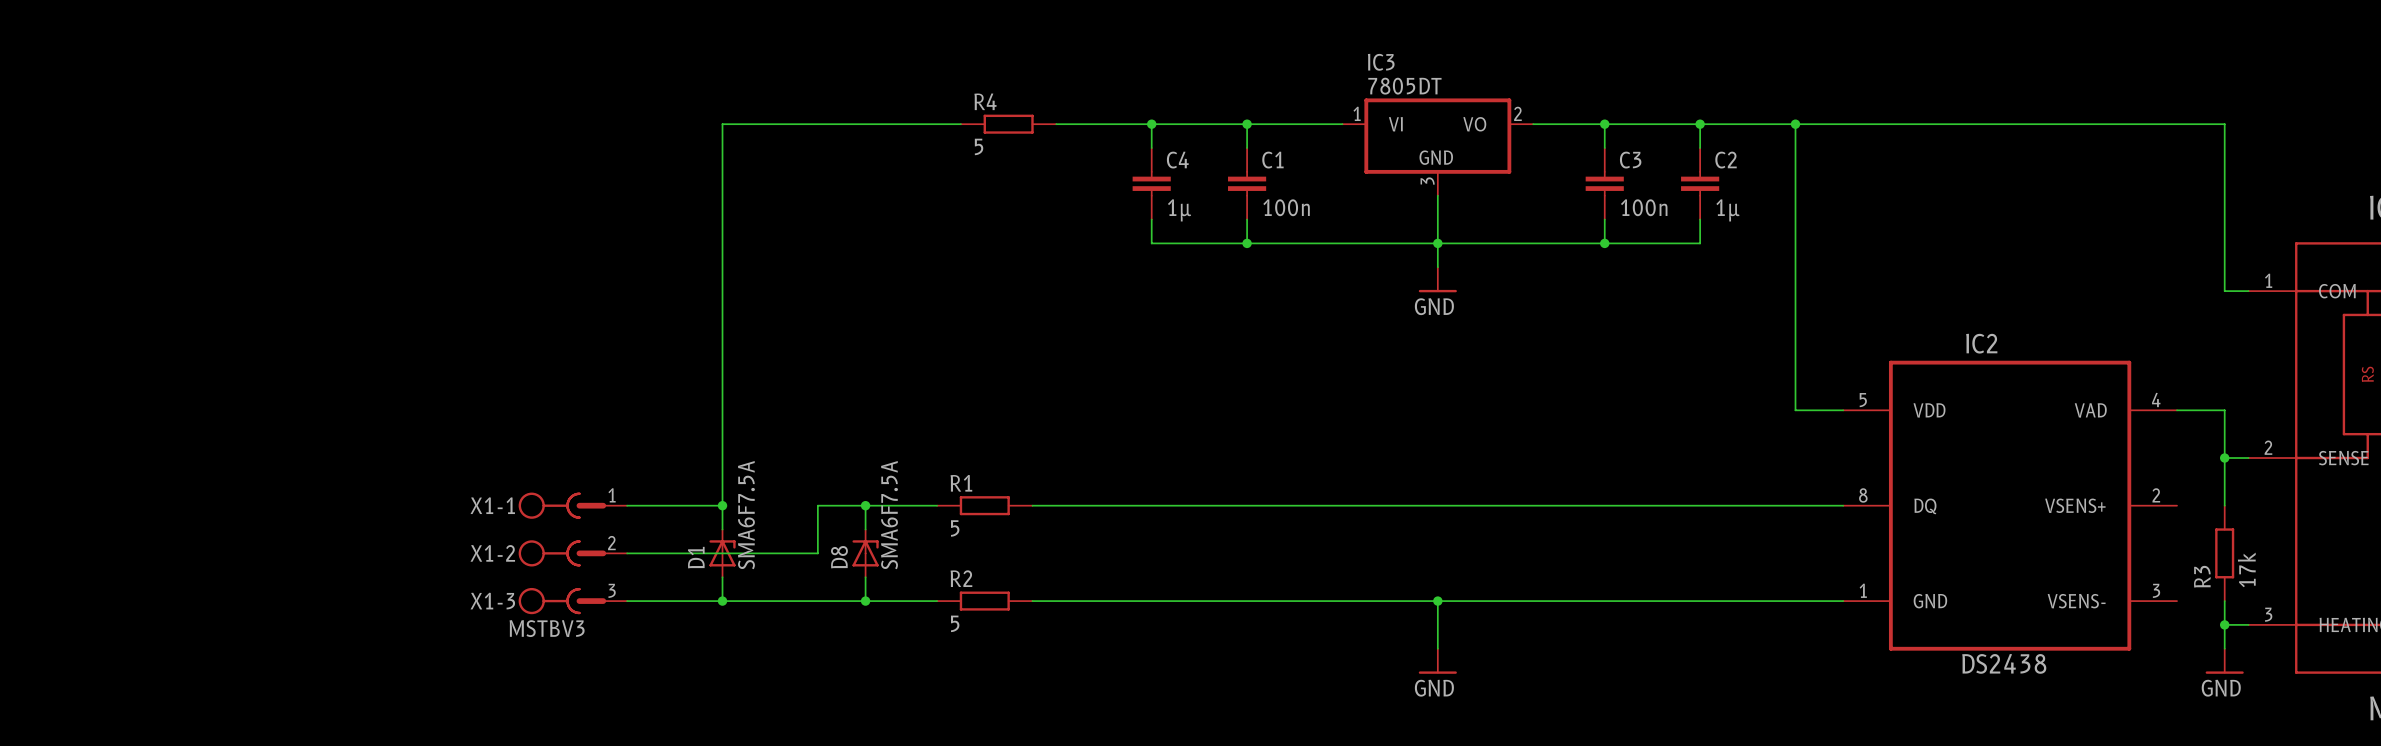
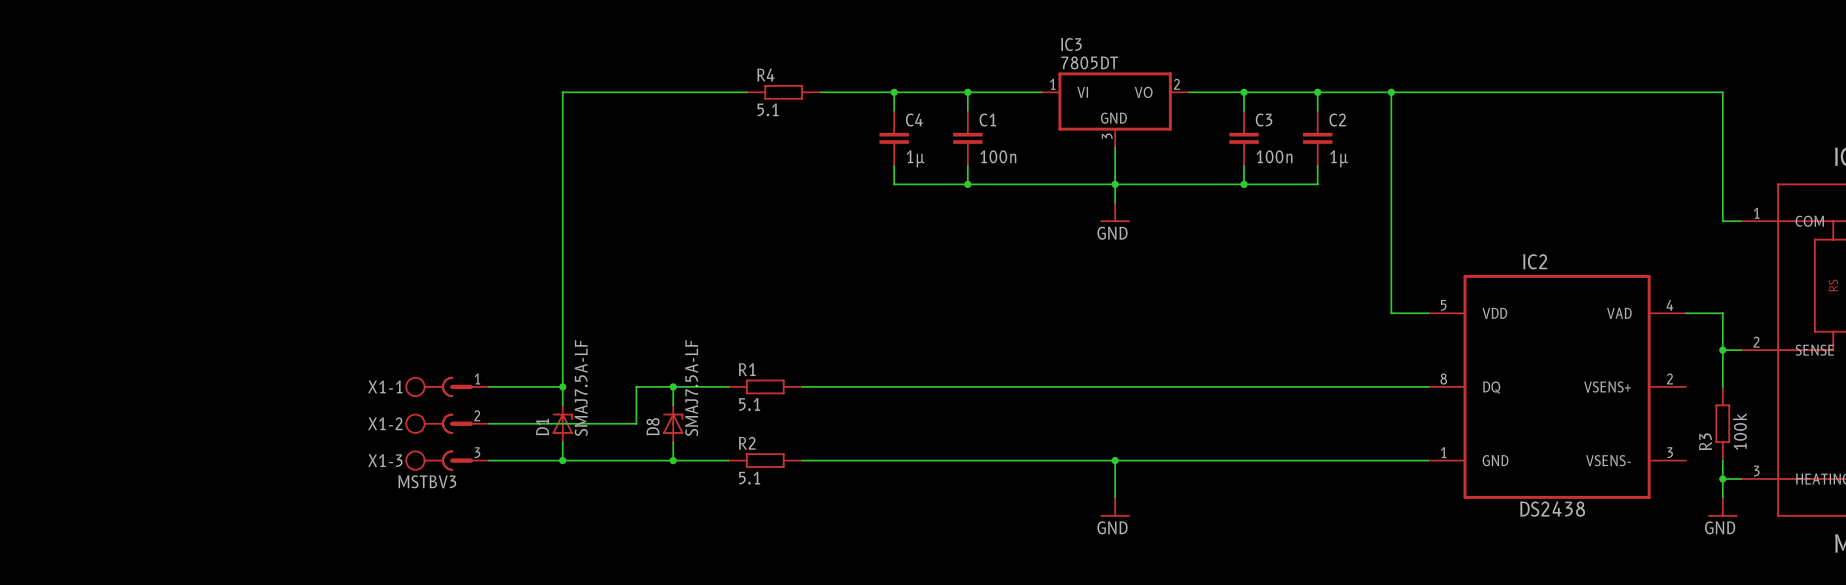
R4 value: 5 (979, 146) -> 5.1 (768, 109)
D1 value: SMA6F7.5A (746, 515) -> SMAJ7.5A-LF (581, 388)
D8 value: SMA6F7.5A (889, 515) -> SMAJ7.5A-LF (691, 388)
R1 value: 5 (955, 528) -> 5.1 (749, 404)
R3 value: 17k (2246, 569) -> 100k (1739, 431)
R2 value: 5 (955, 623) -> 5.1 (749, 478)

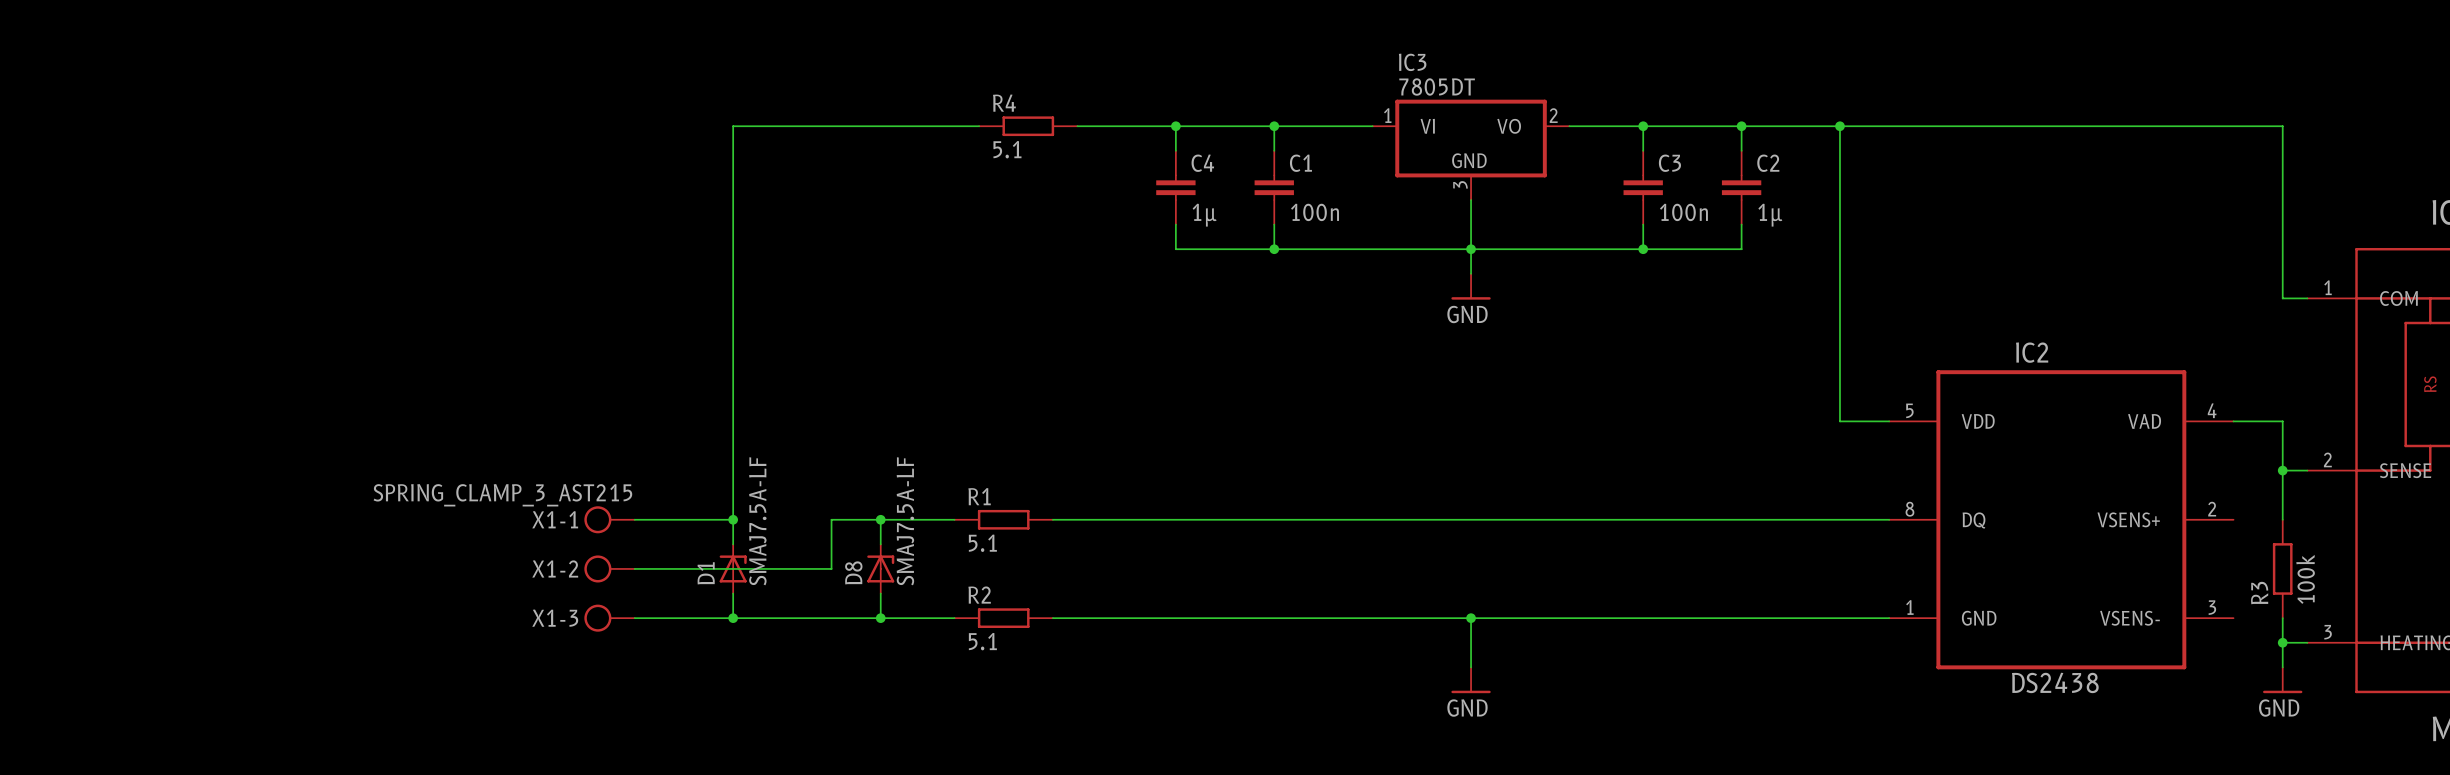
X1-1 value: none -> SPRING_CLAMP_3_AST215 (502, 495)
X1-1 symbol: [405, 376, 490, 398] -> [584, 506, 635, 534]
X1-1 name position: X1-1 (385, 386) -> X1-1 (555, 519)
X1-2 symbol: [405, 413, 490, 434] -> [584, 555, 635, 583]
X1-2 name position: X1-2 (385, 423) -> X1-2 (555, 568)
X1-3 symbol: [405, 450, 490, 471] -> [584, 604, 635, 632]
X1-3 name position: X1-3 (385, 460) -> X1-3 (555, 618)
X1-3 value: MSTBV3 (427, 481) -> none

